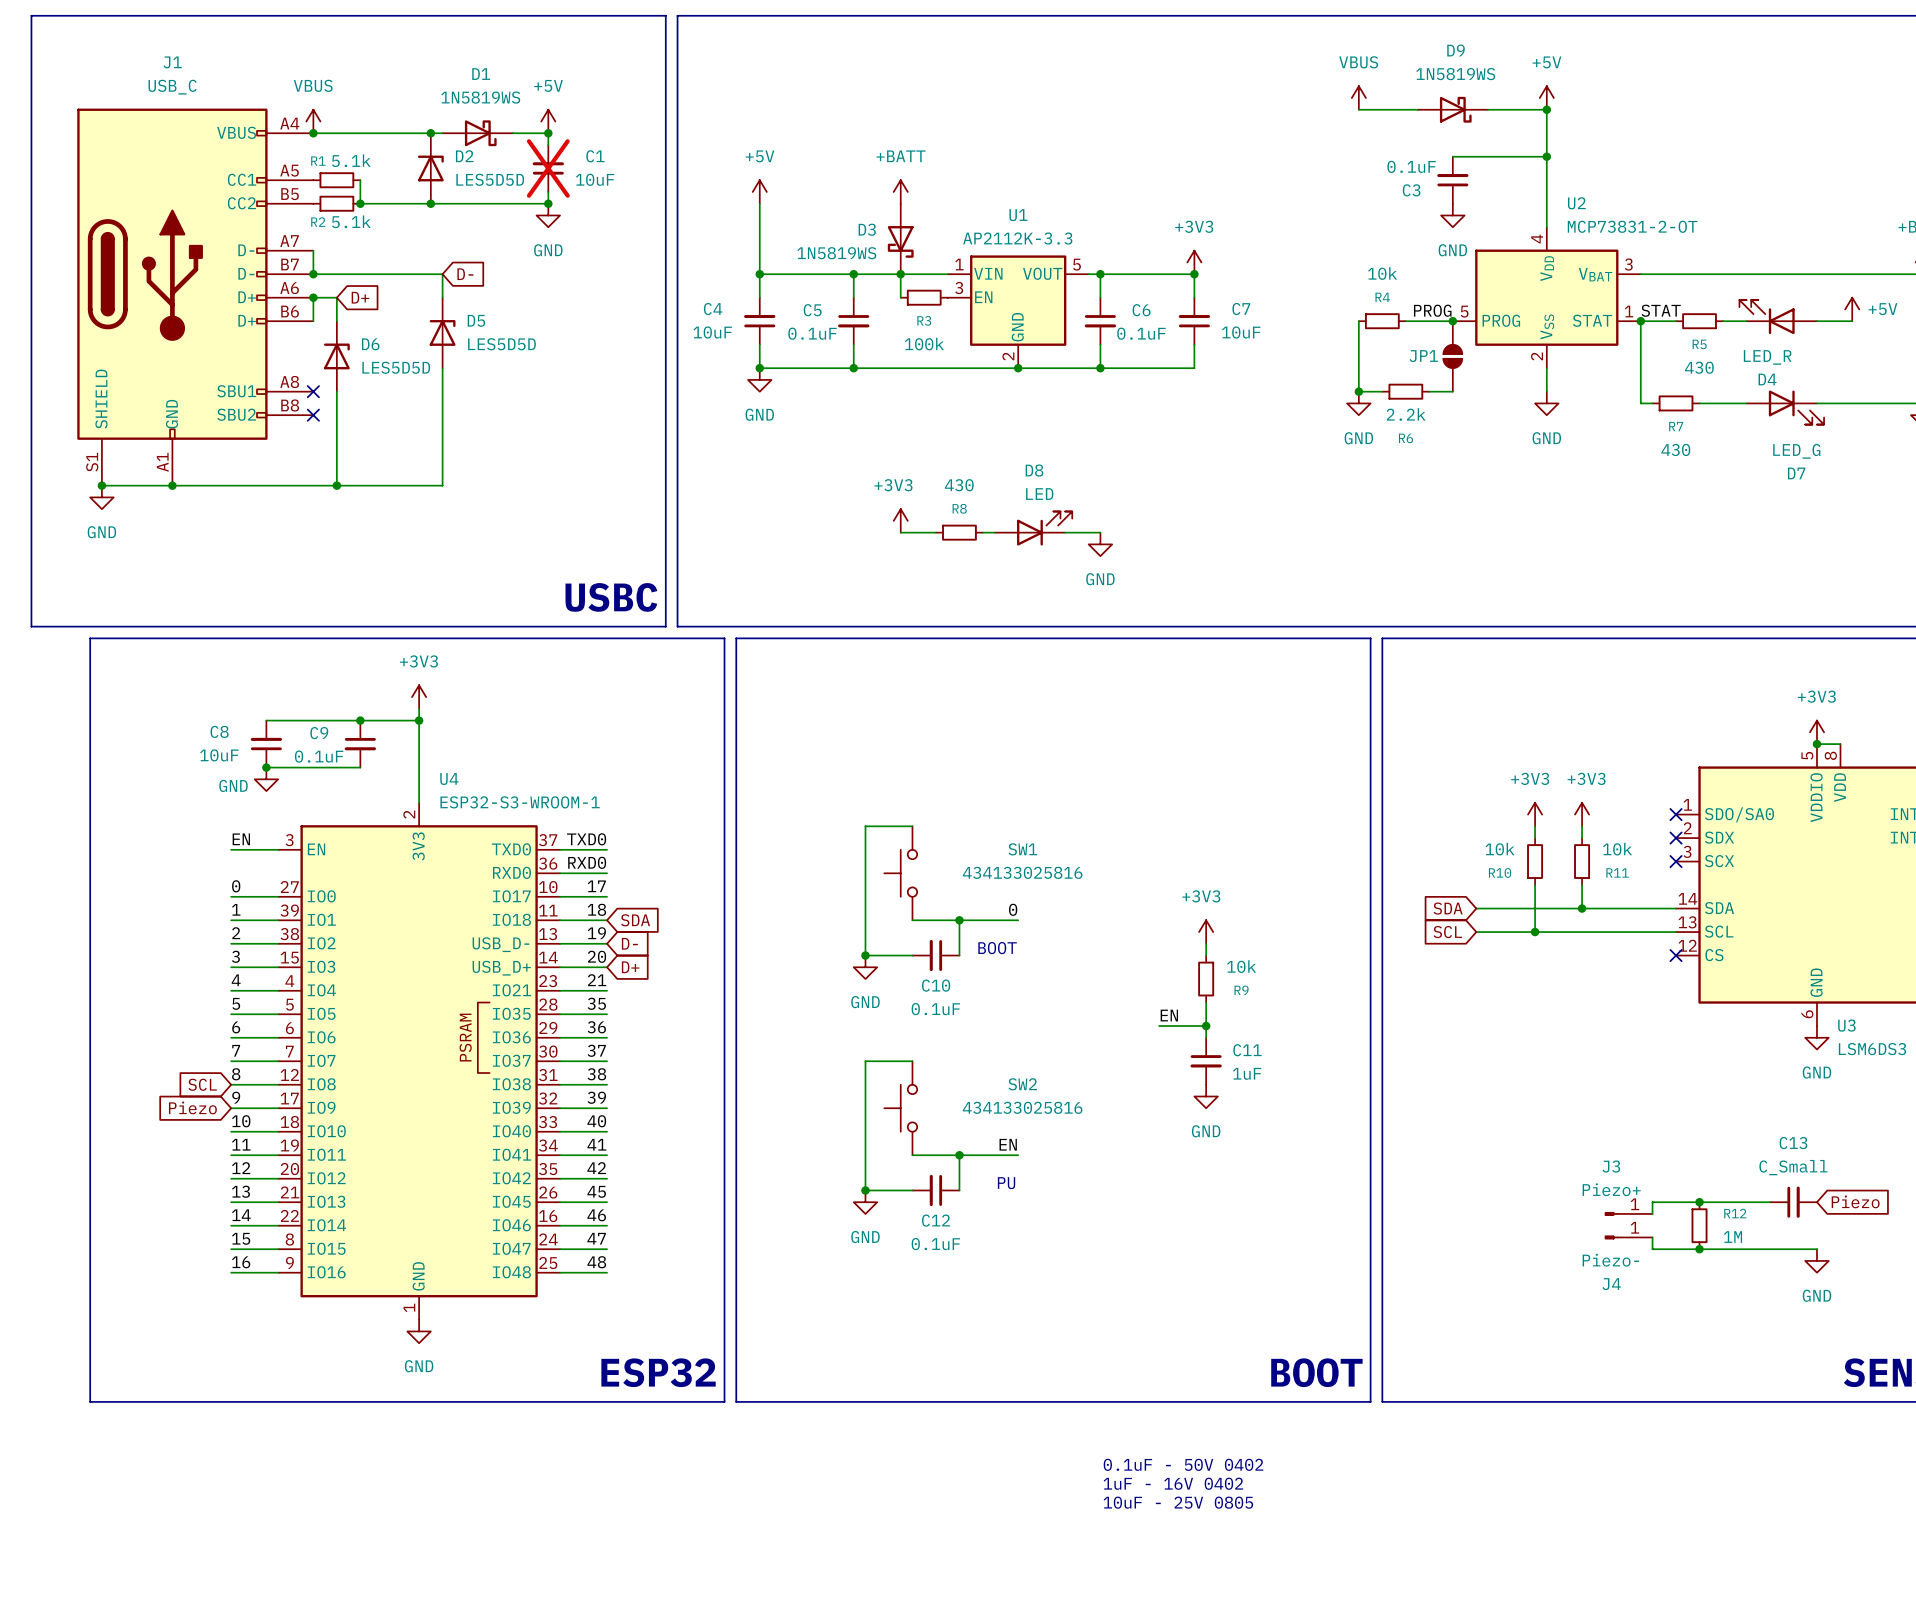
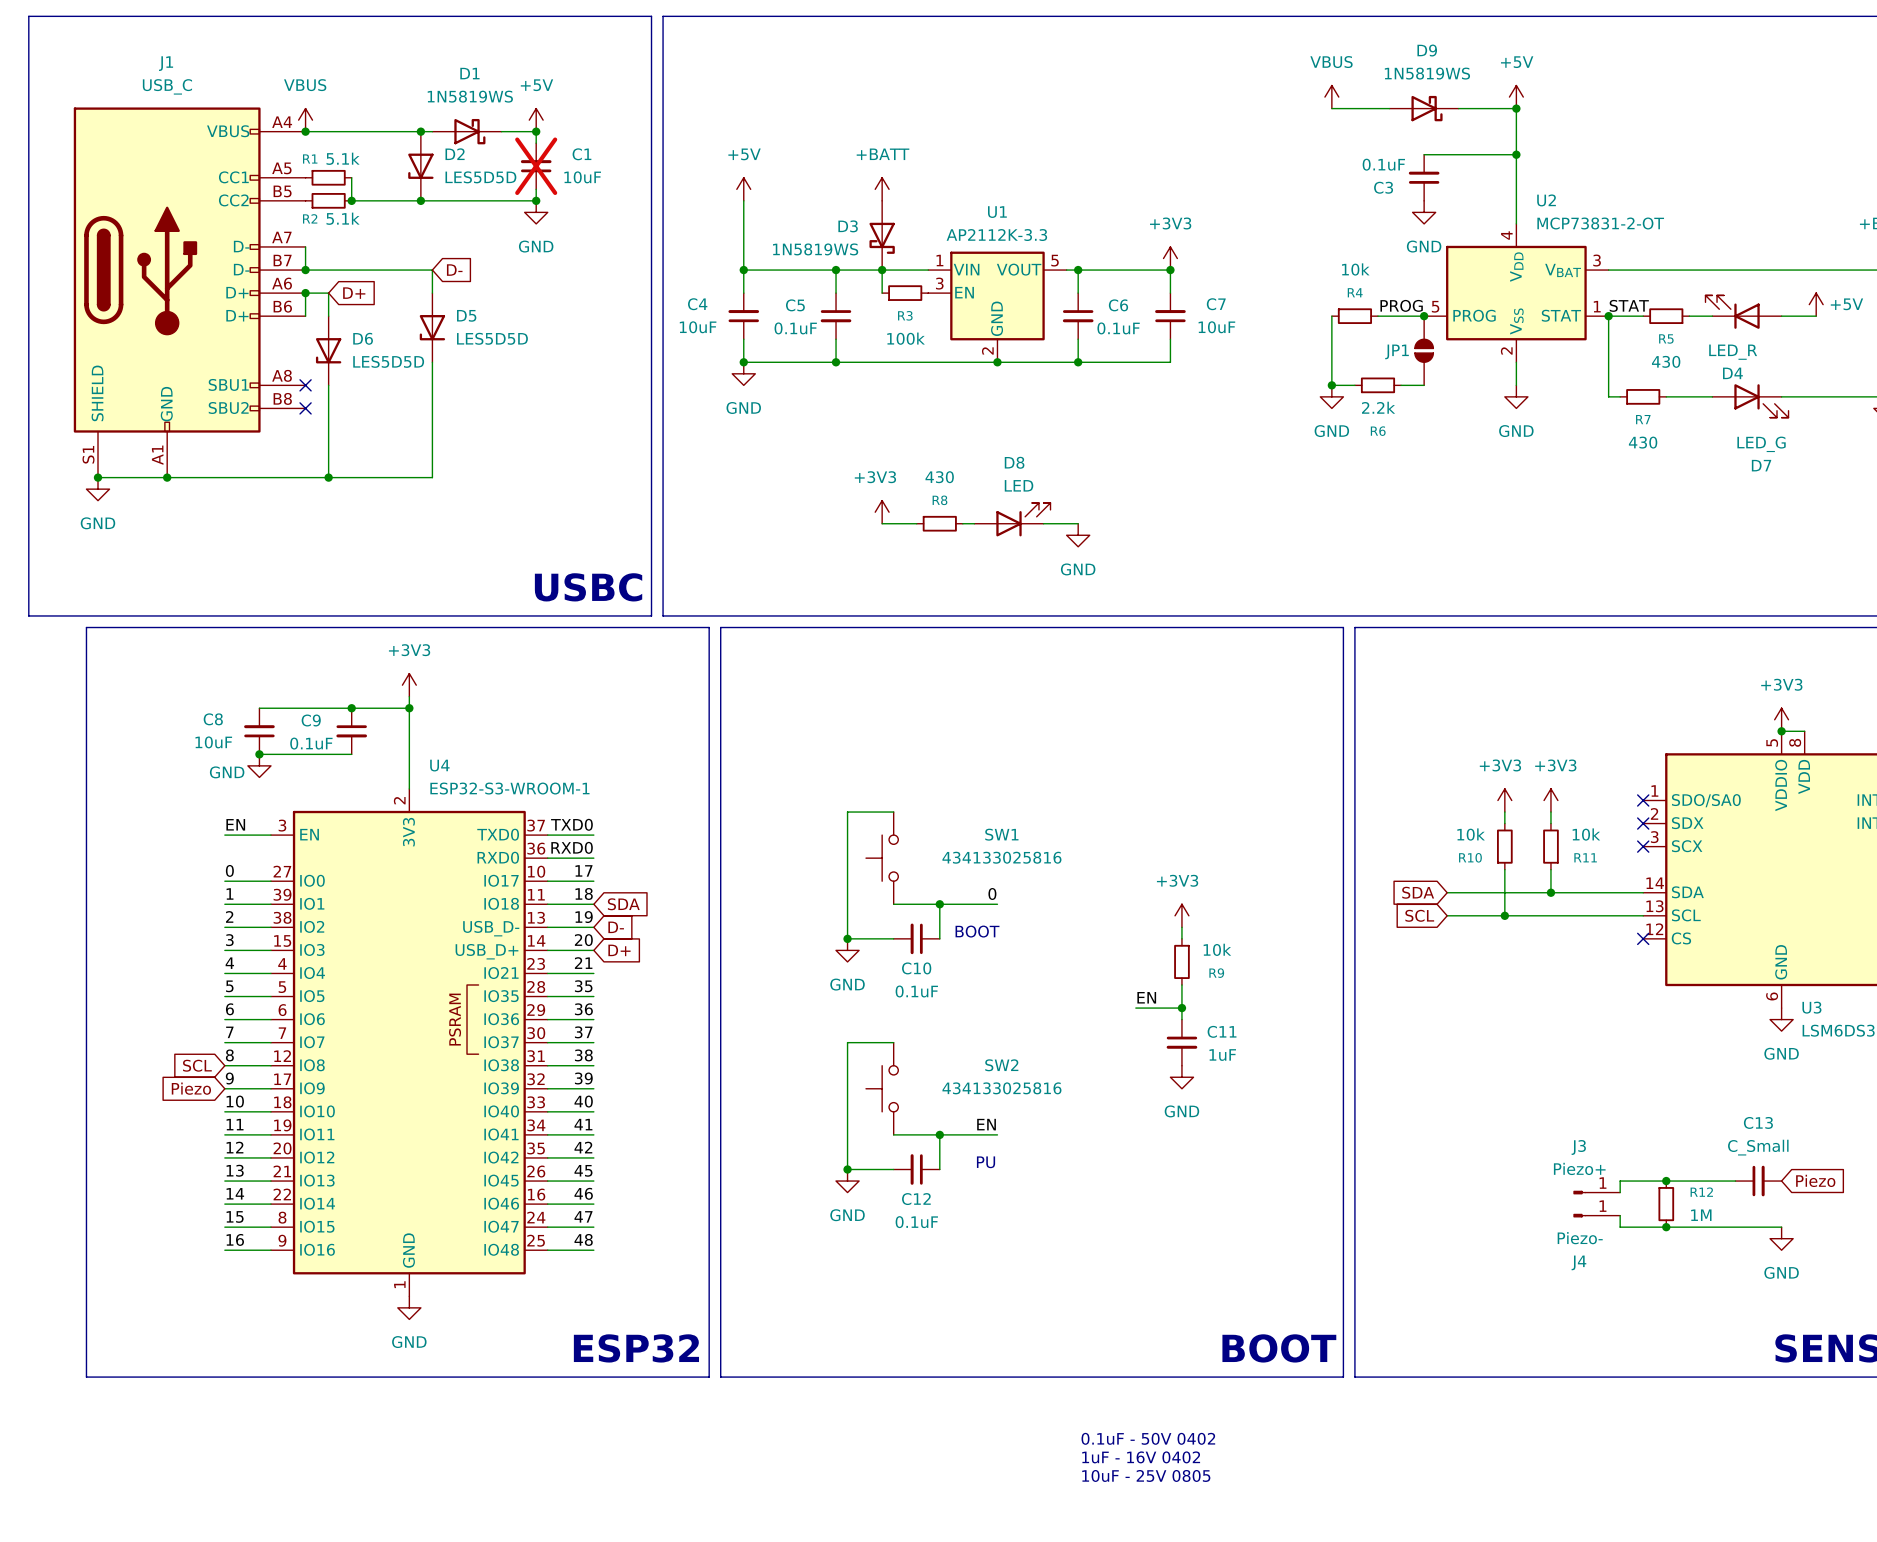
D2 rotation: 0° (430, 168) -> 180° (420, 166)
D5 rotation: 0° (442, 332) -> 180° (432, 327)
D6 rotation: 0° (336, 356) -> 180° (328, 350)

